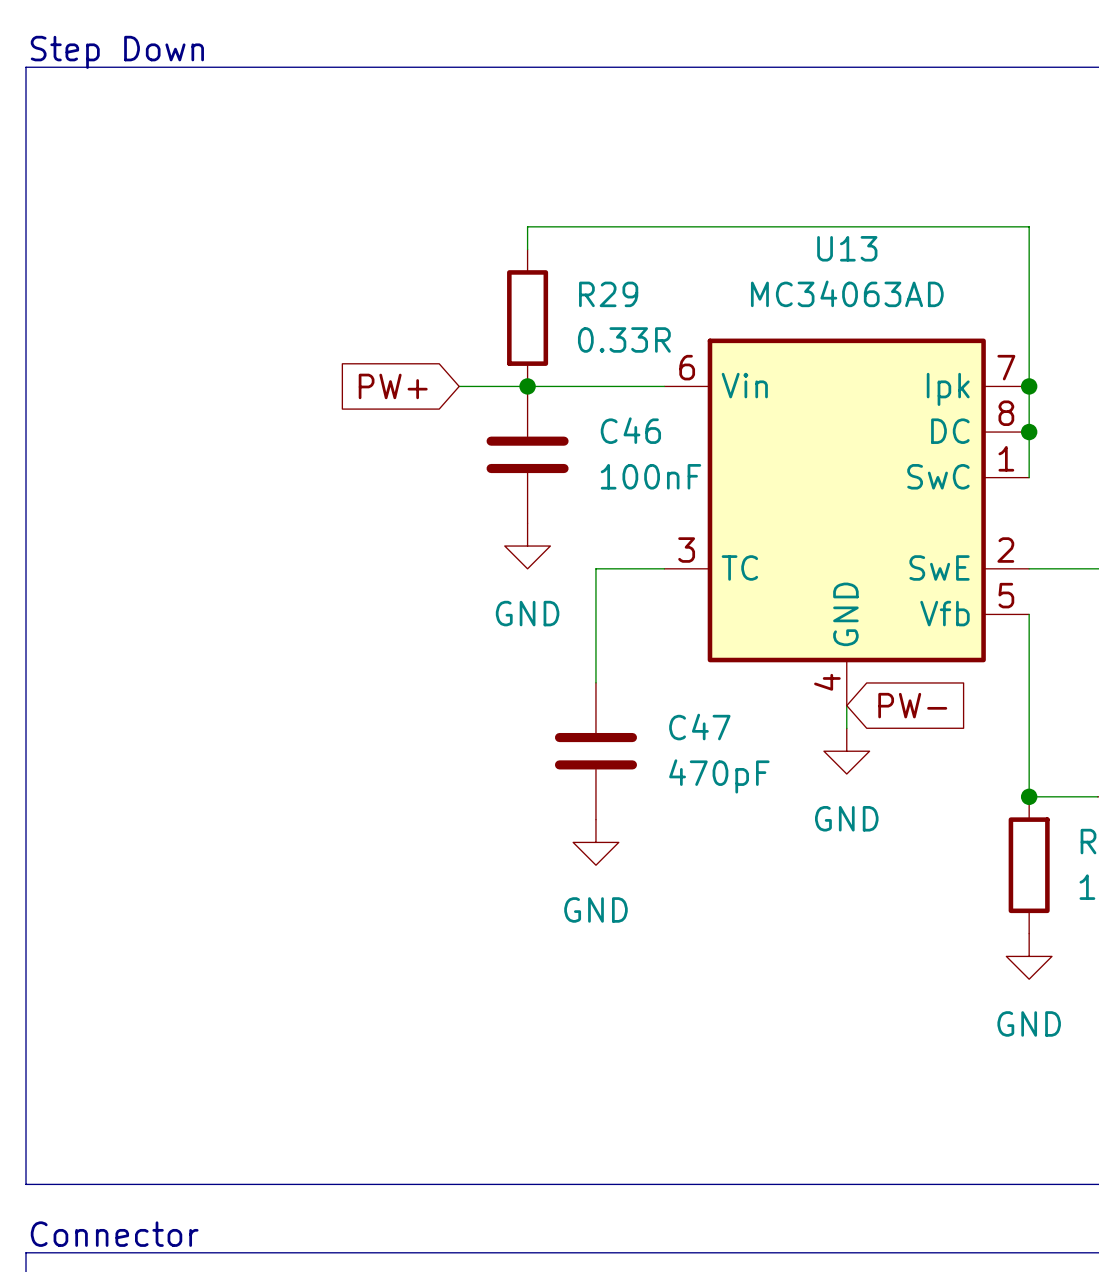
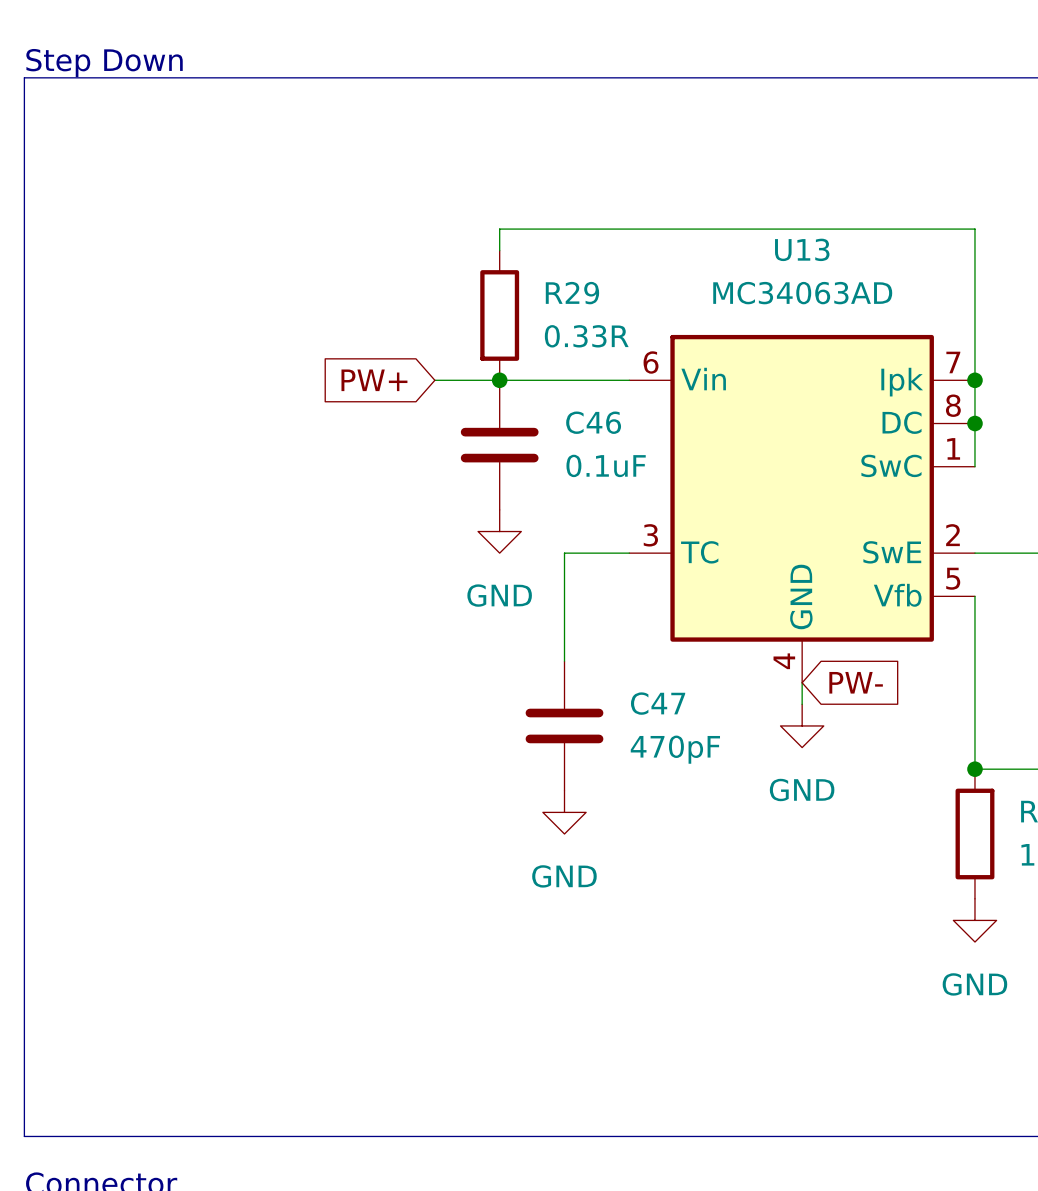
C46 value: 100nF (650, 476) -> 0.1uF (606, 465)

